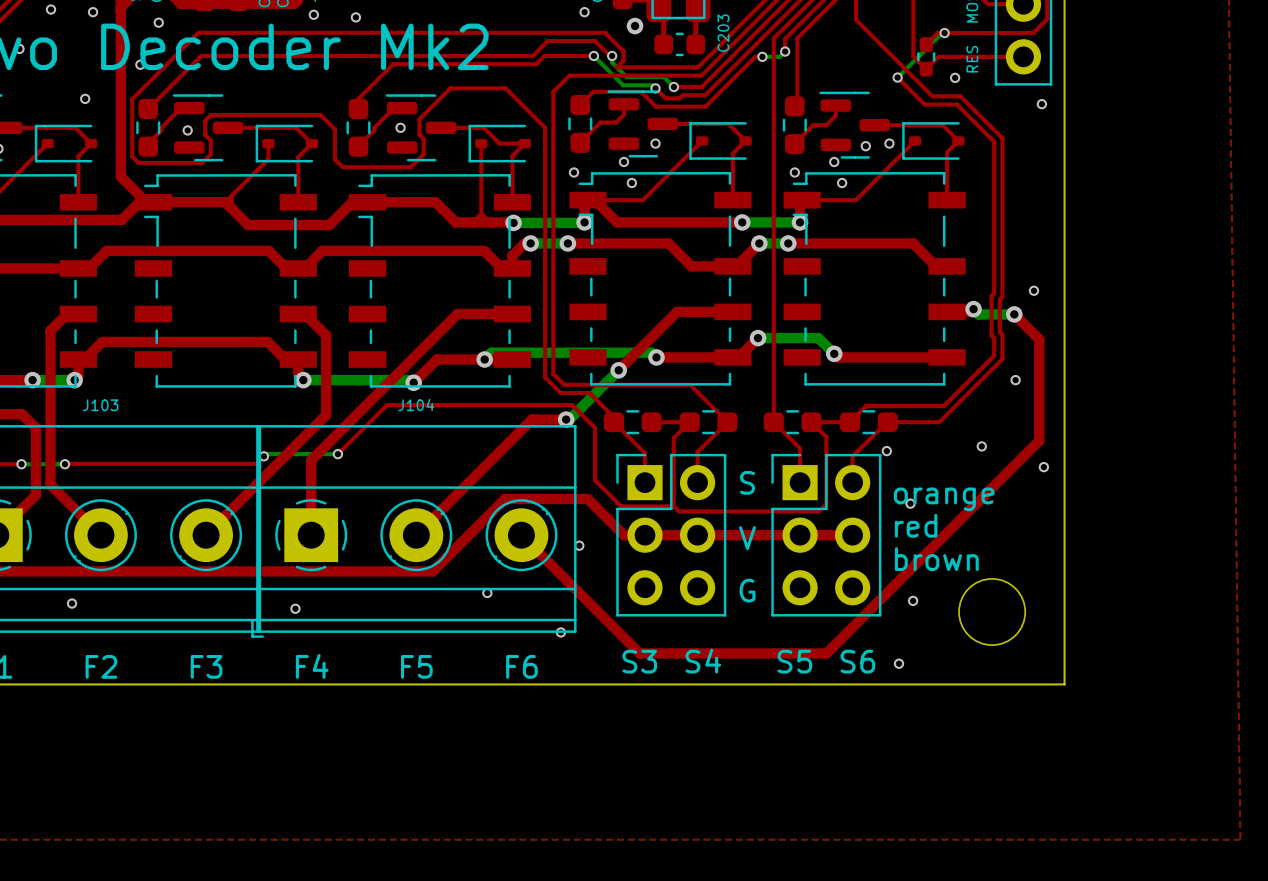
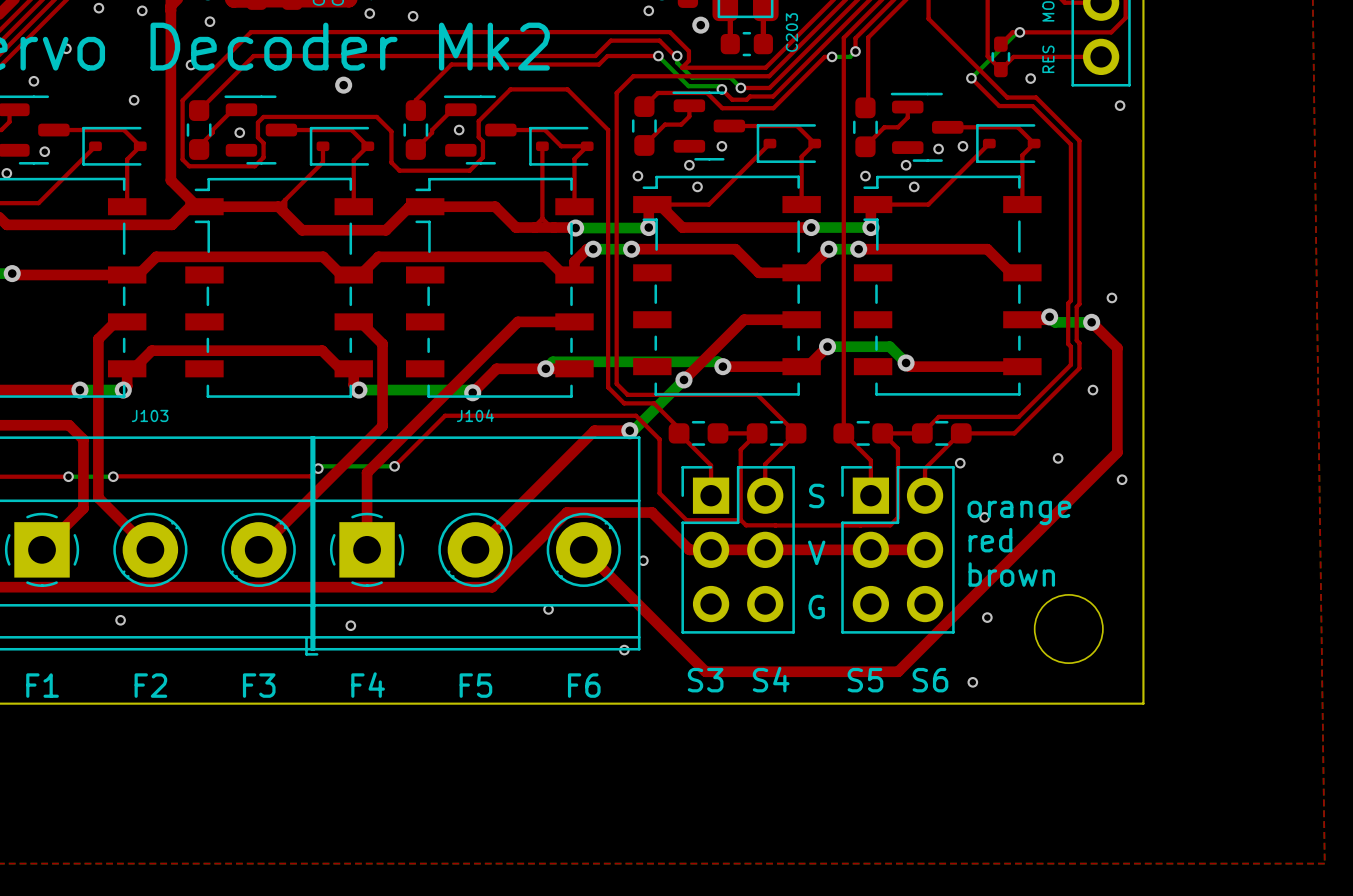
via: none -> (343, 85)

